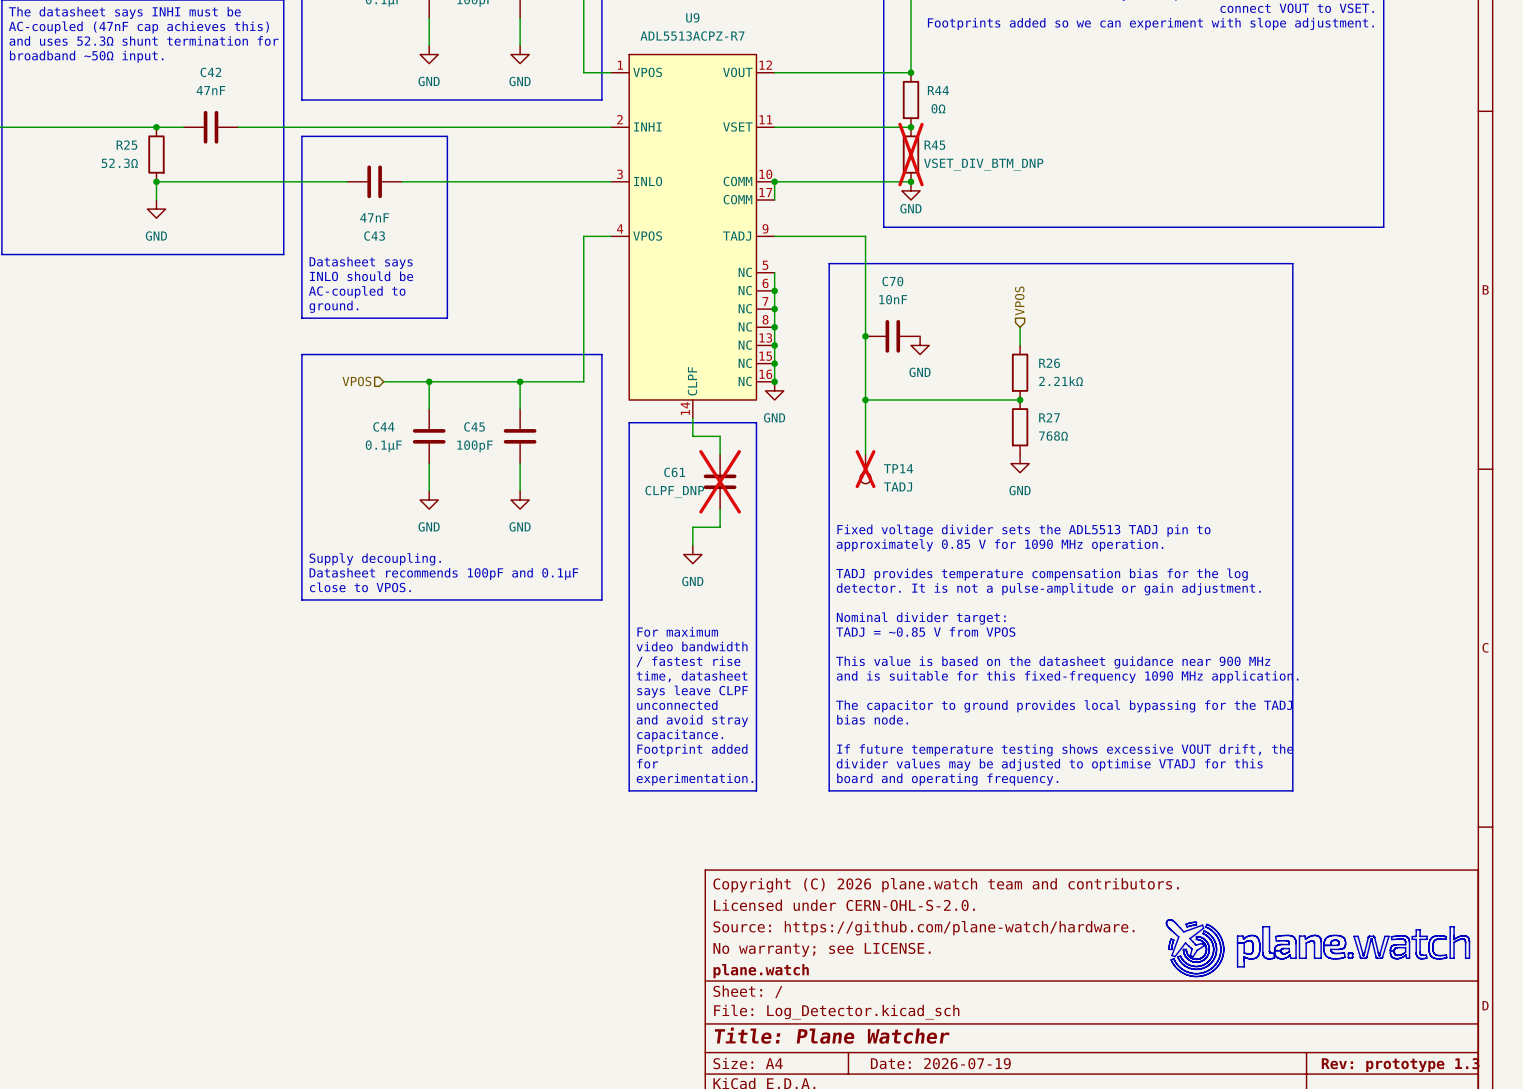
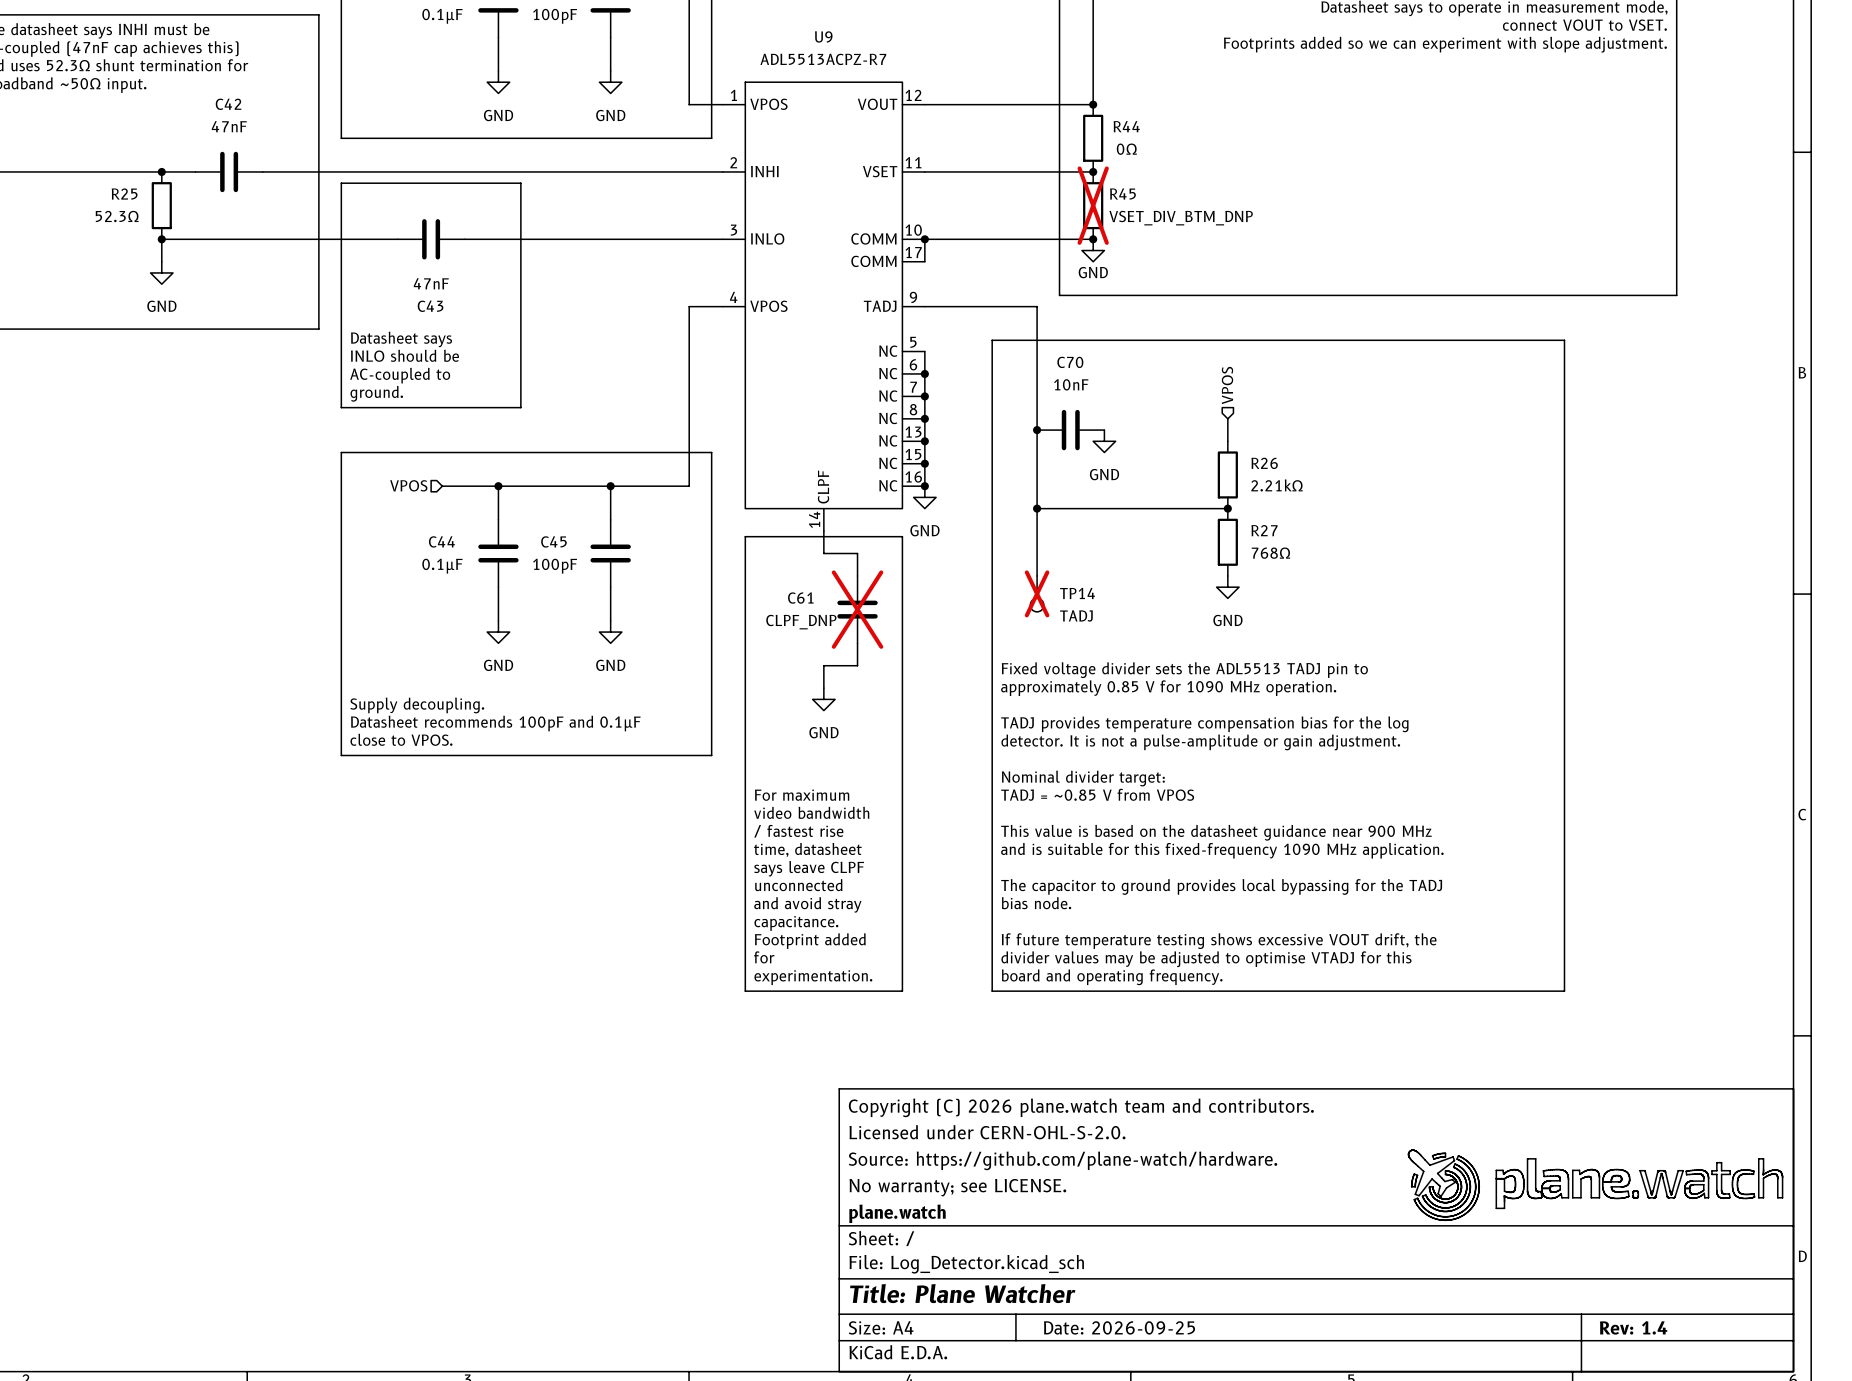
title block: Date: 2026-07-19 (940, 1063) -> Date: 2026-09-25 (1119, 1327)
title block: Rev: prototype 1.3 (1400, 1065) -> Rev: 1.4 (1633, 1327)

